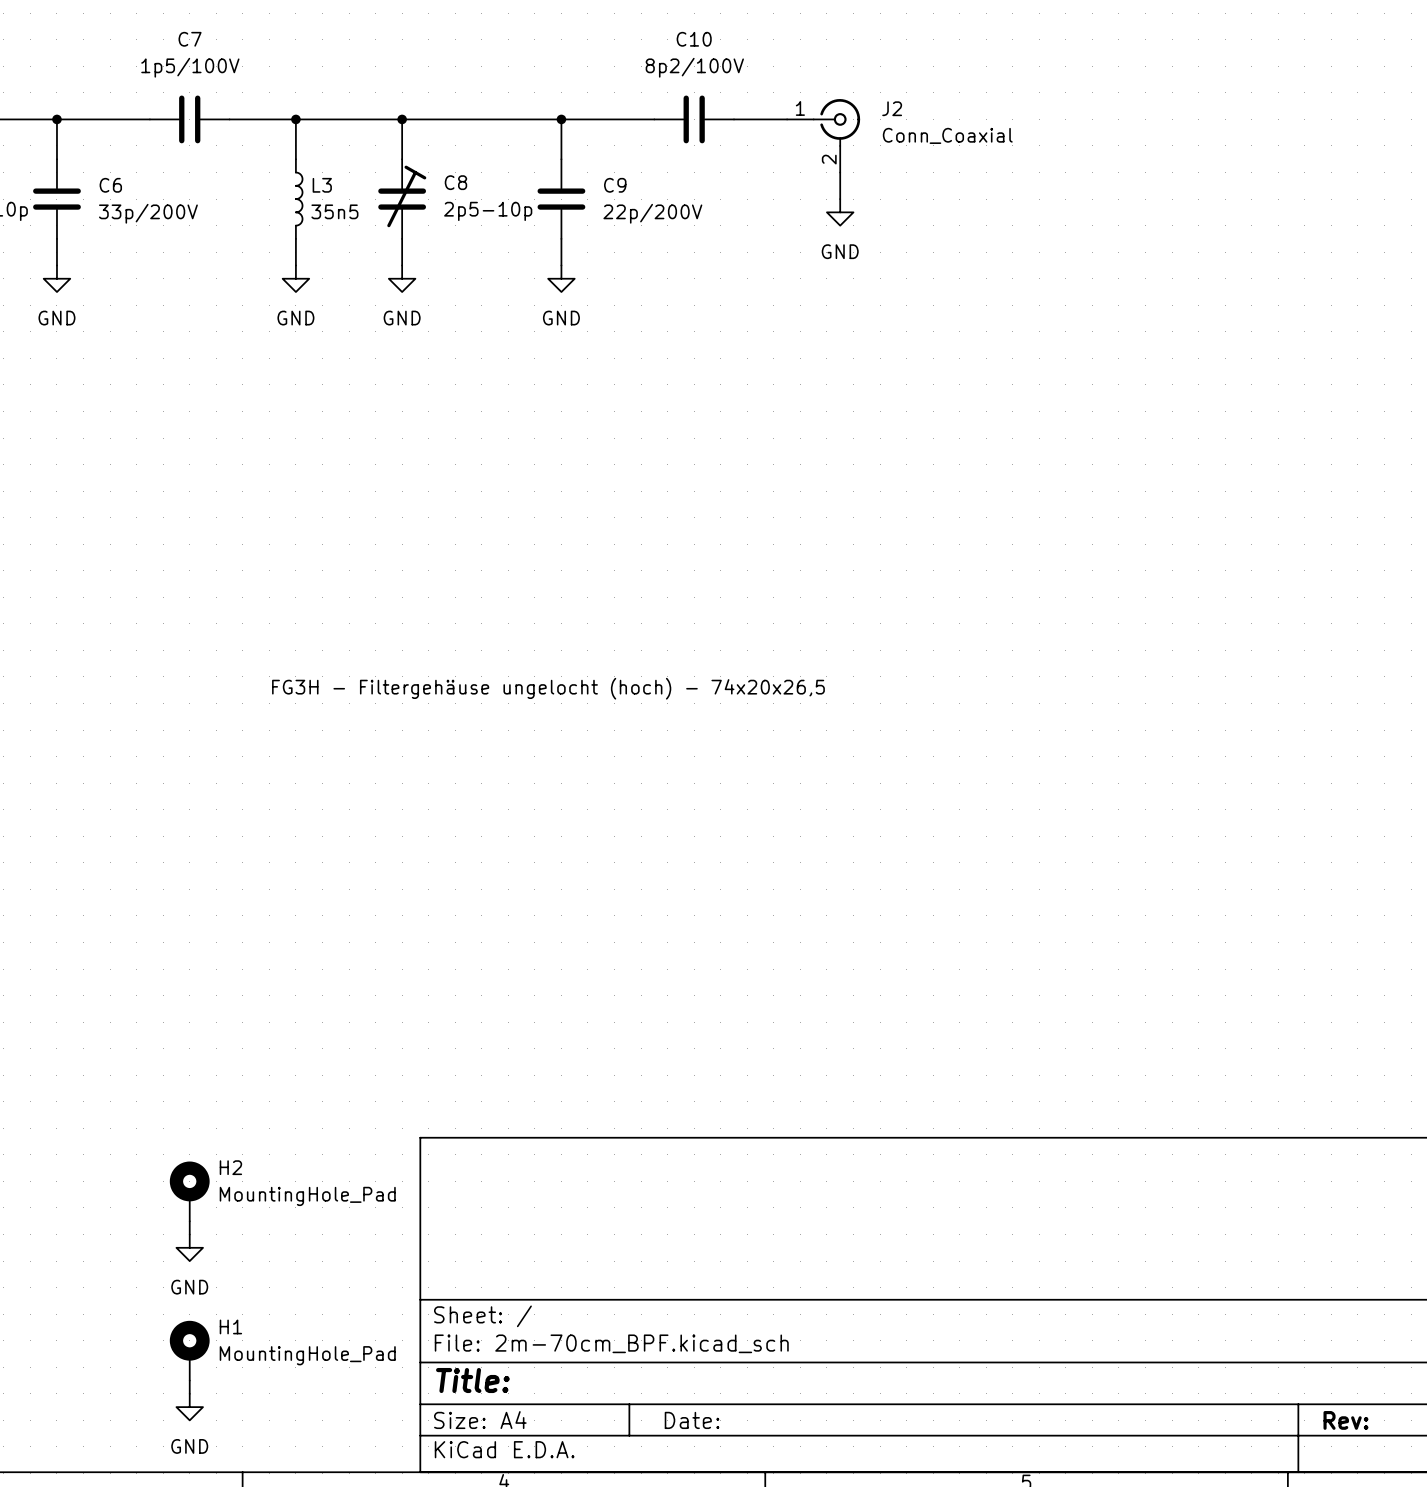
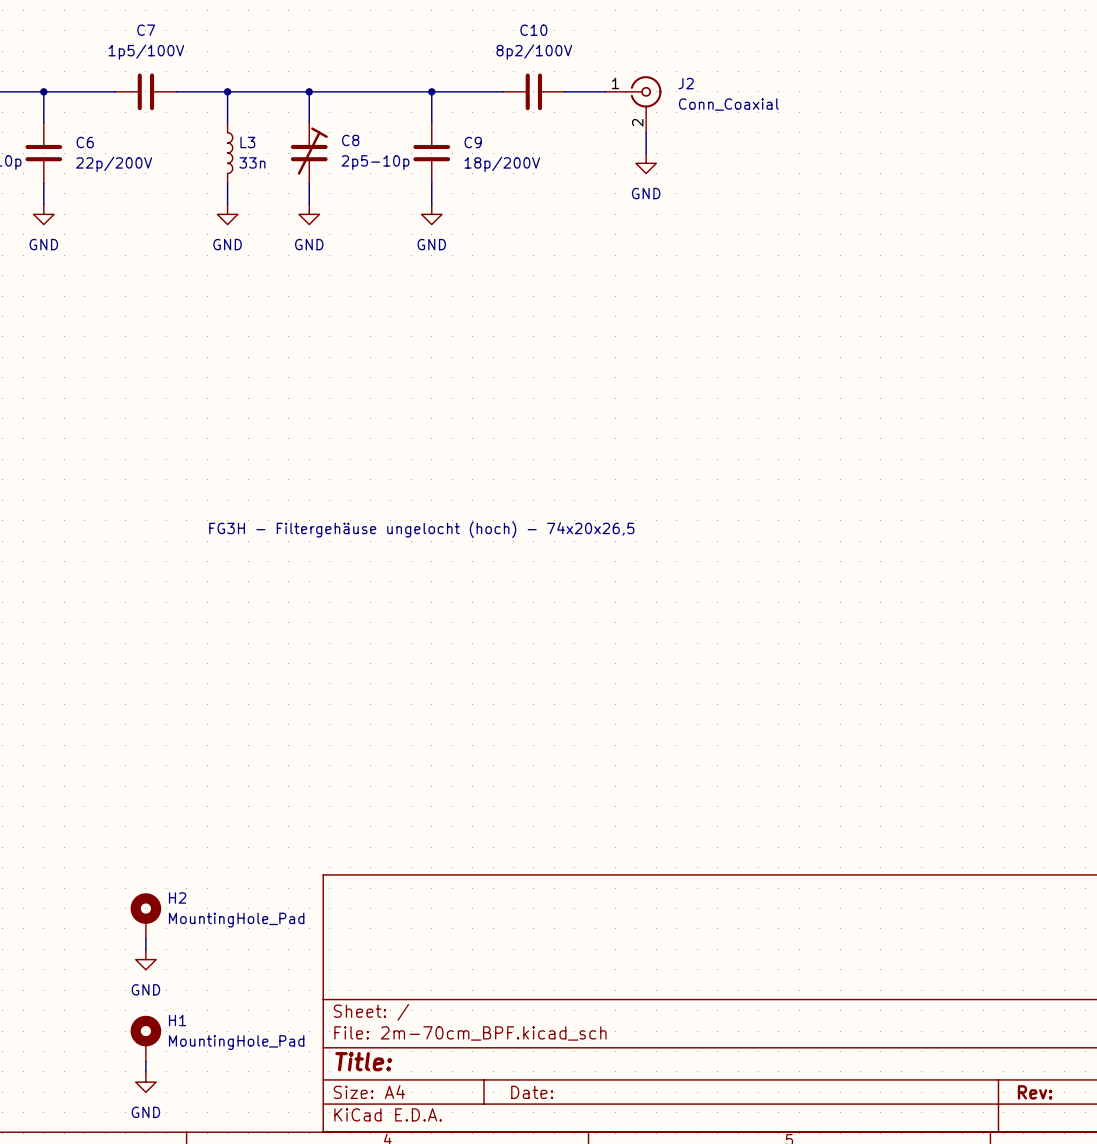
L3 value: 35n5 (334, 211) -> 33n (252, 162)
C6 value: 33p/200V (148, 213) -> 22p/200V (114, 164)
C9 value: 22p/200V (652, 213) -> 18p/200V (502, 164)

